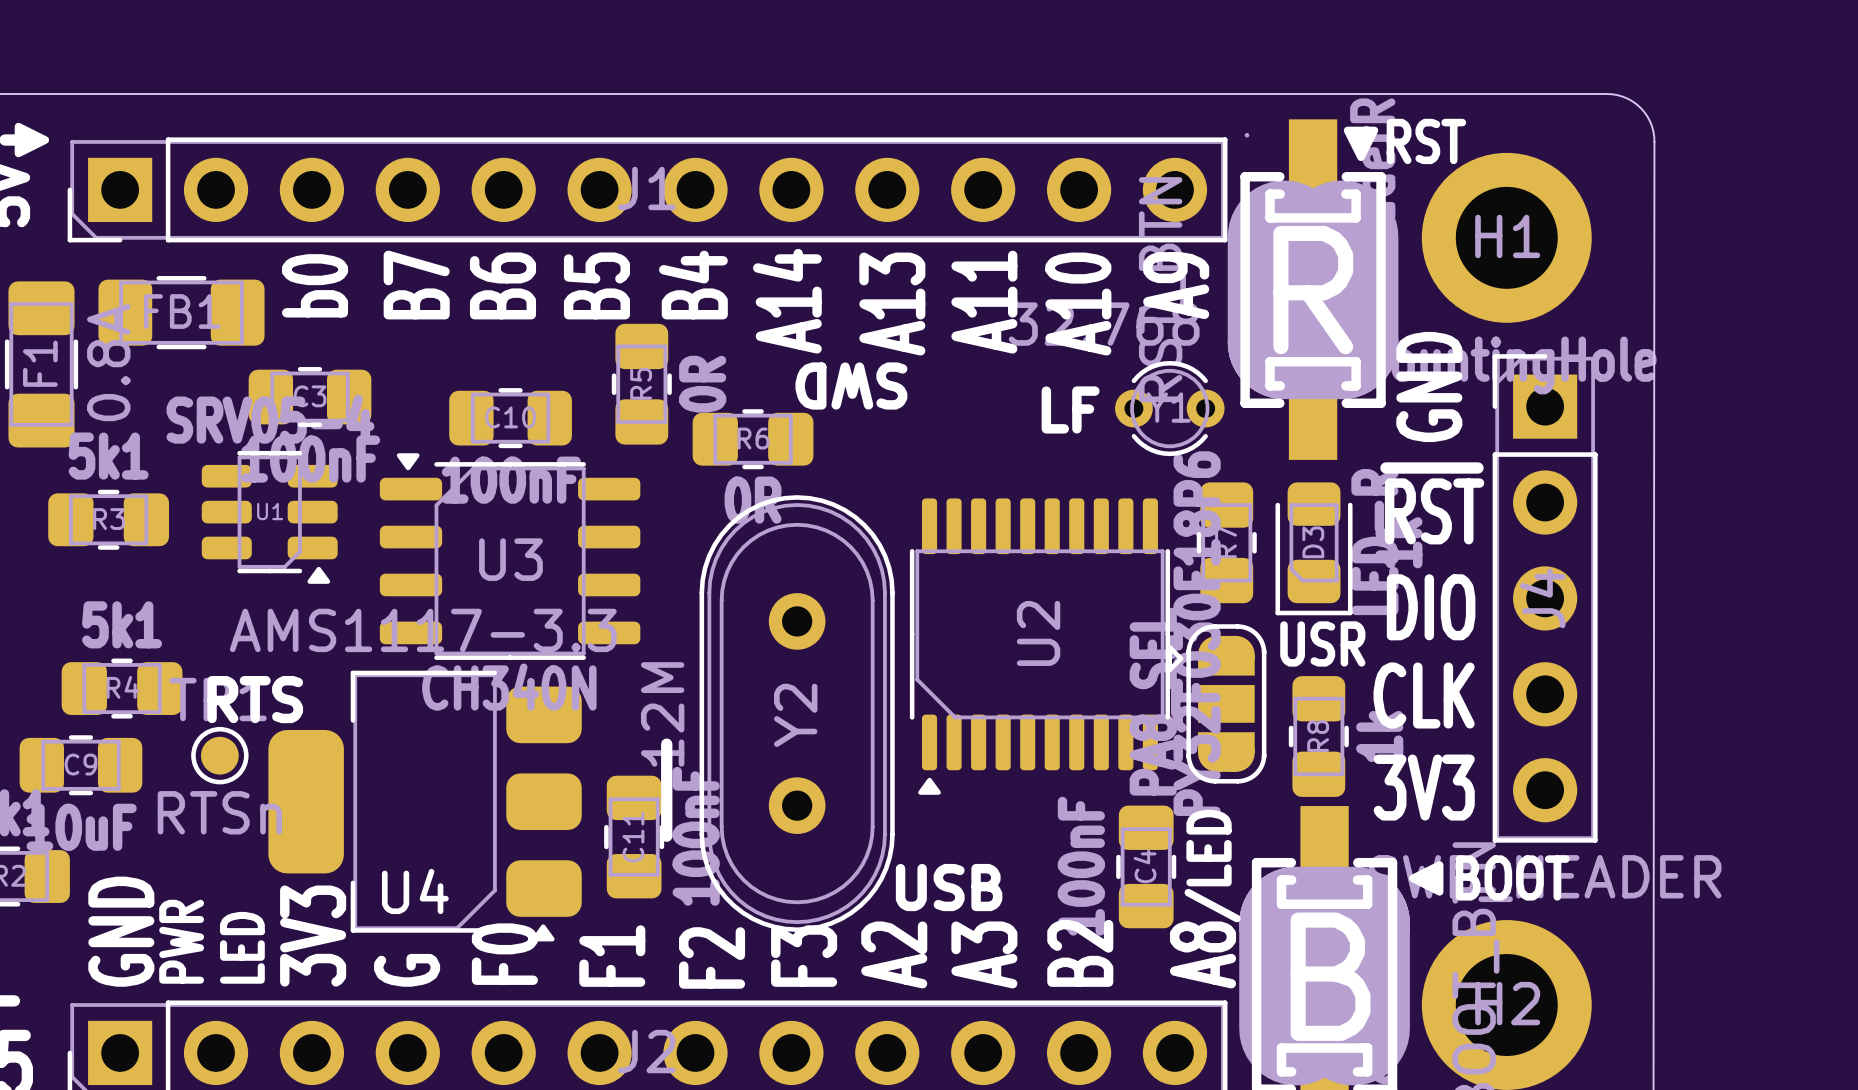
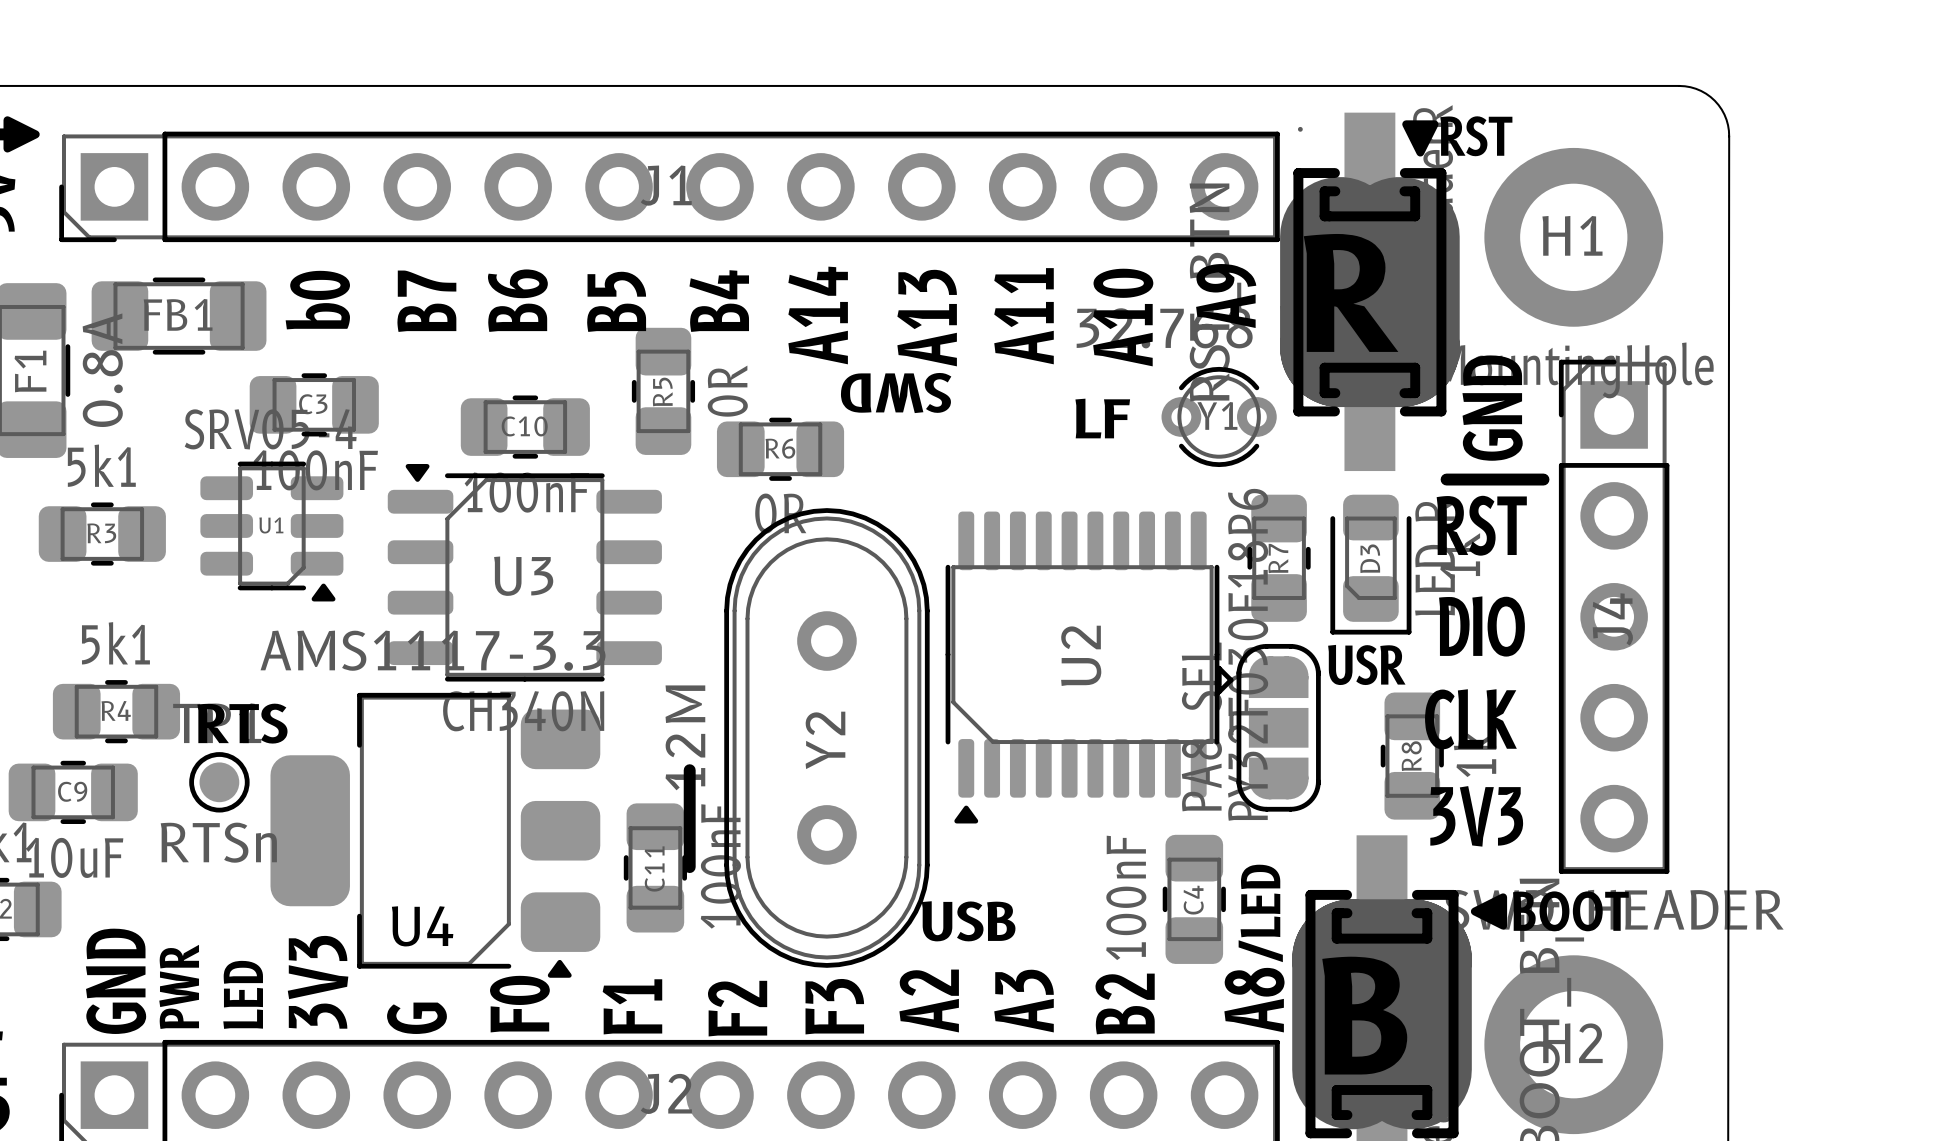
R8 position: (1318, 736) -> (1412, 756)

